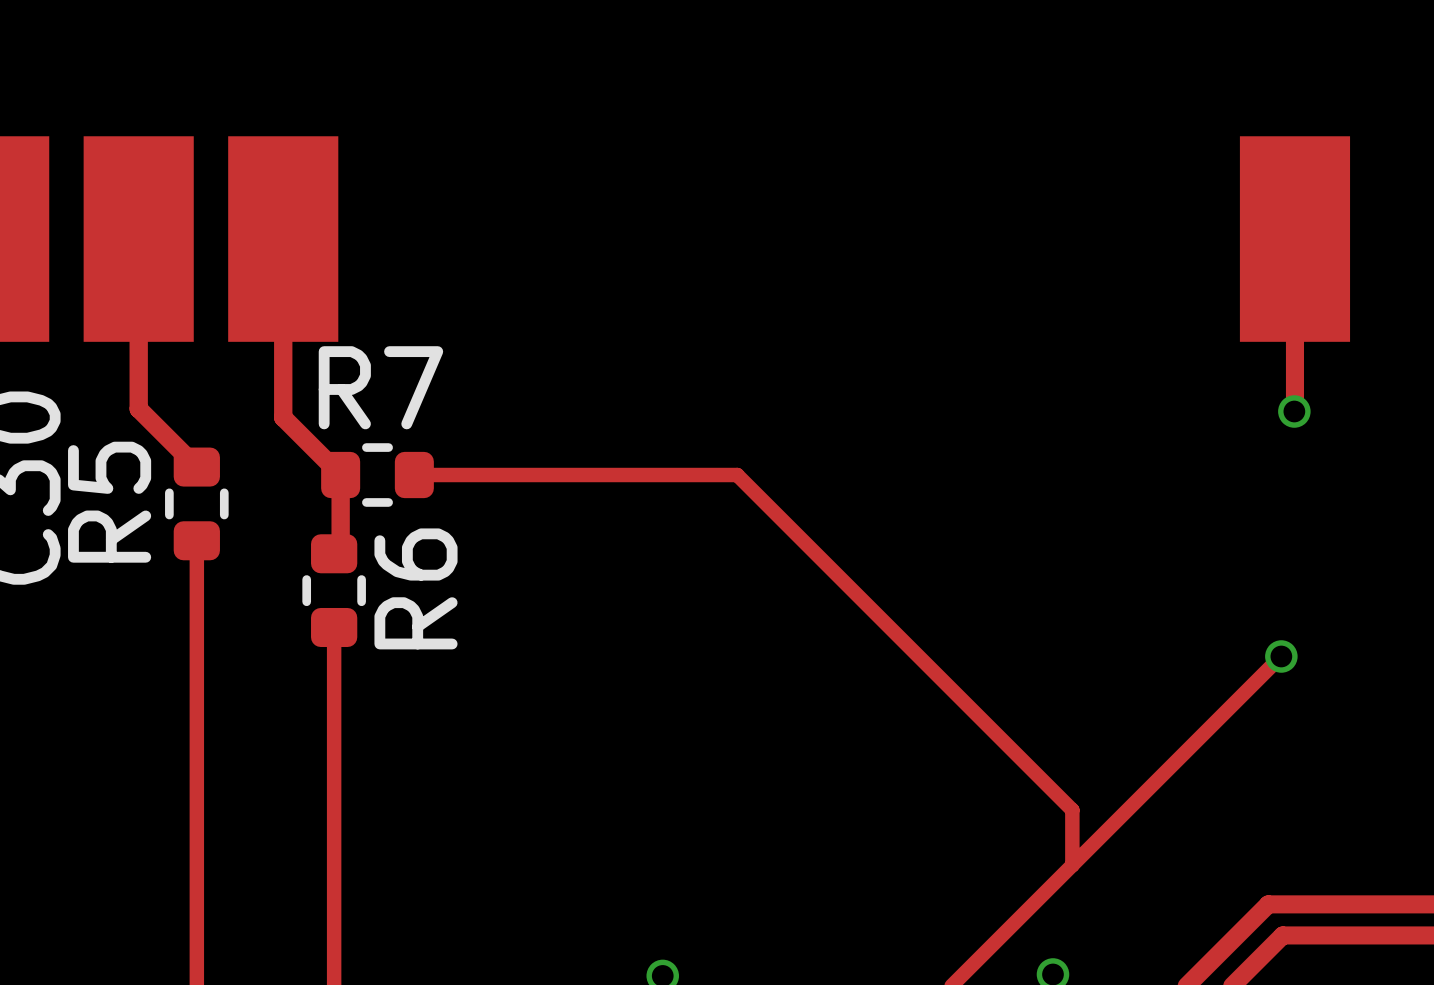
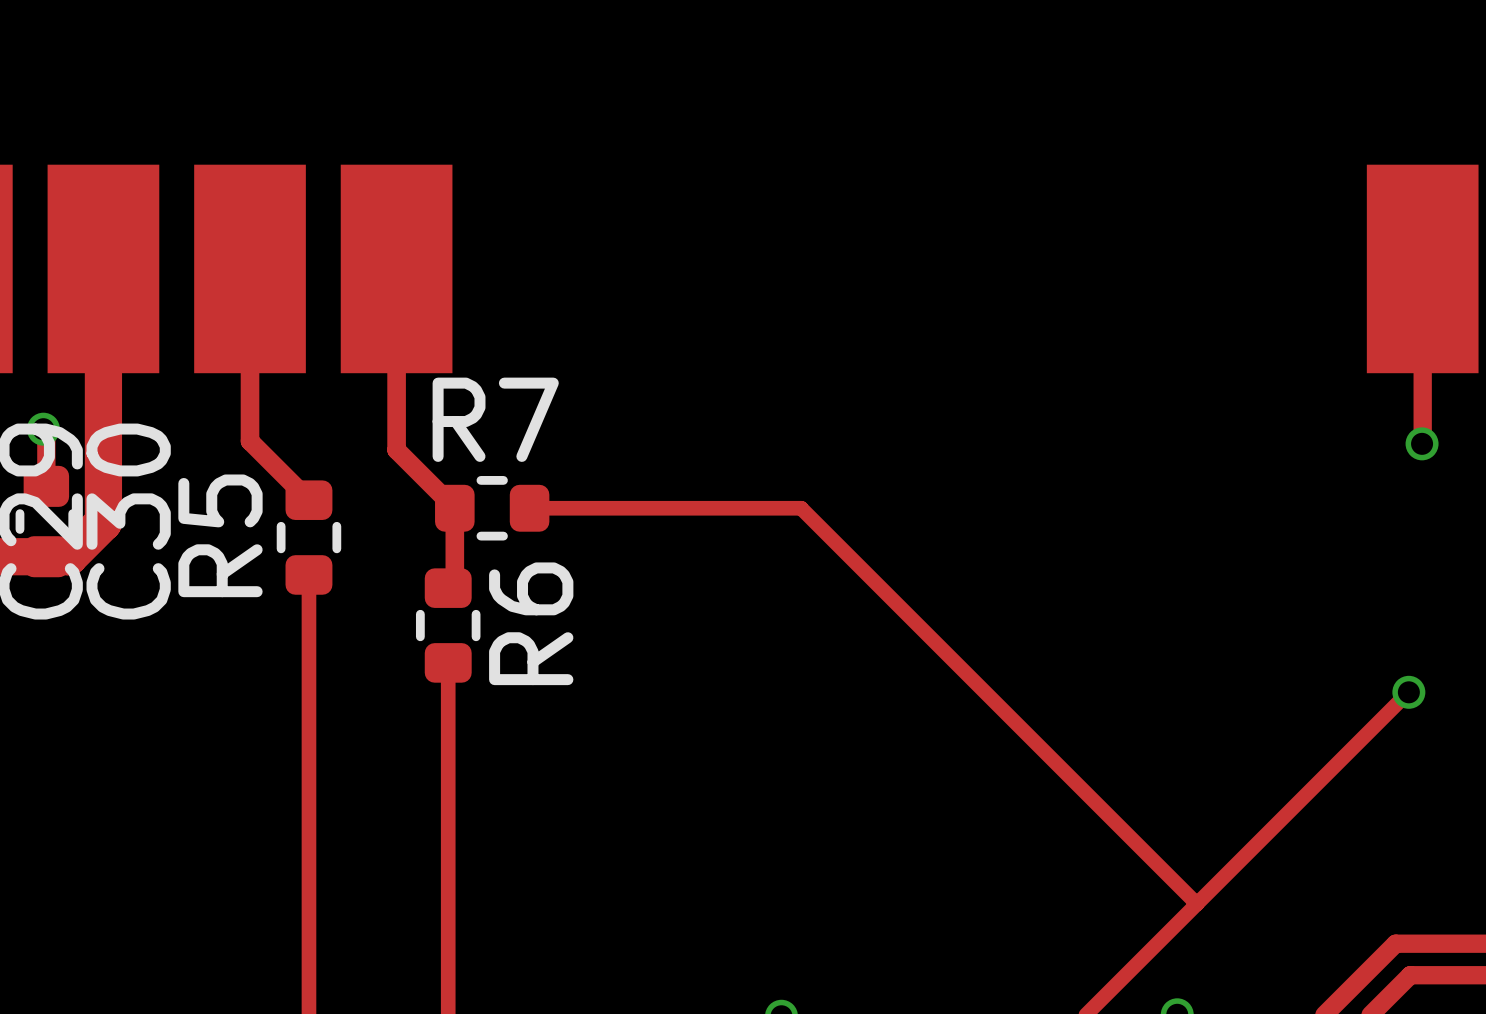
track: (682, 475) (737, 475) (1072, 810) (1072, 865) -> (801, 508) (1196, 903)

